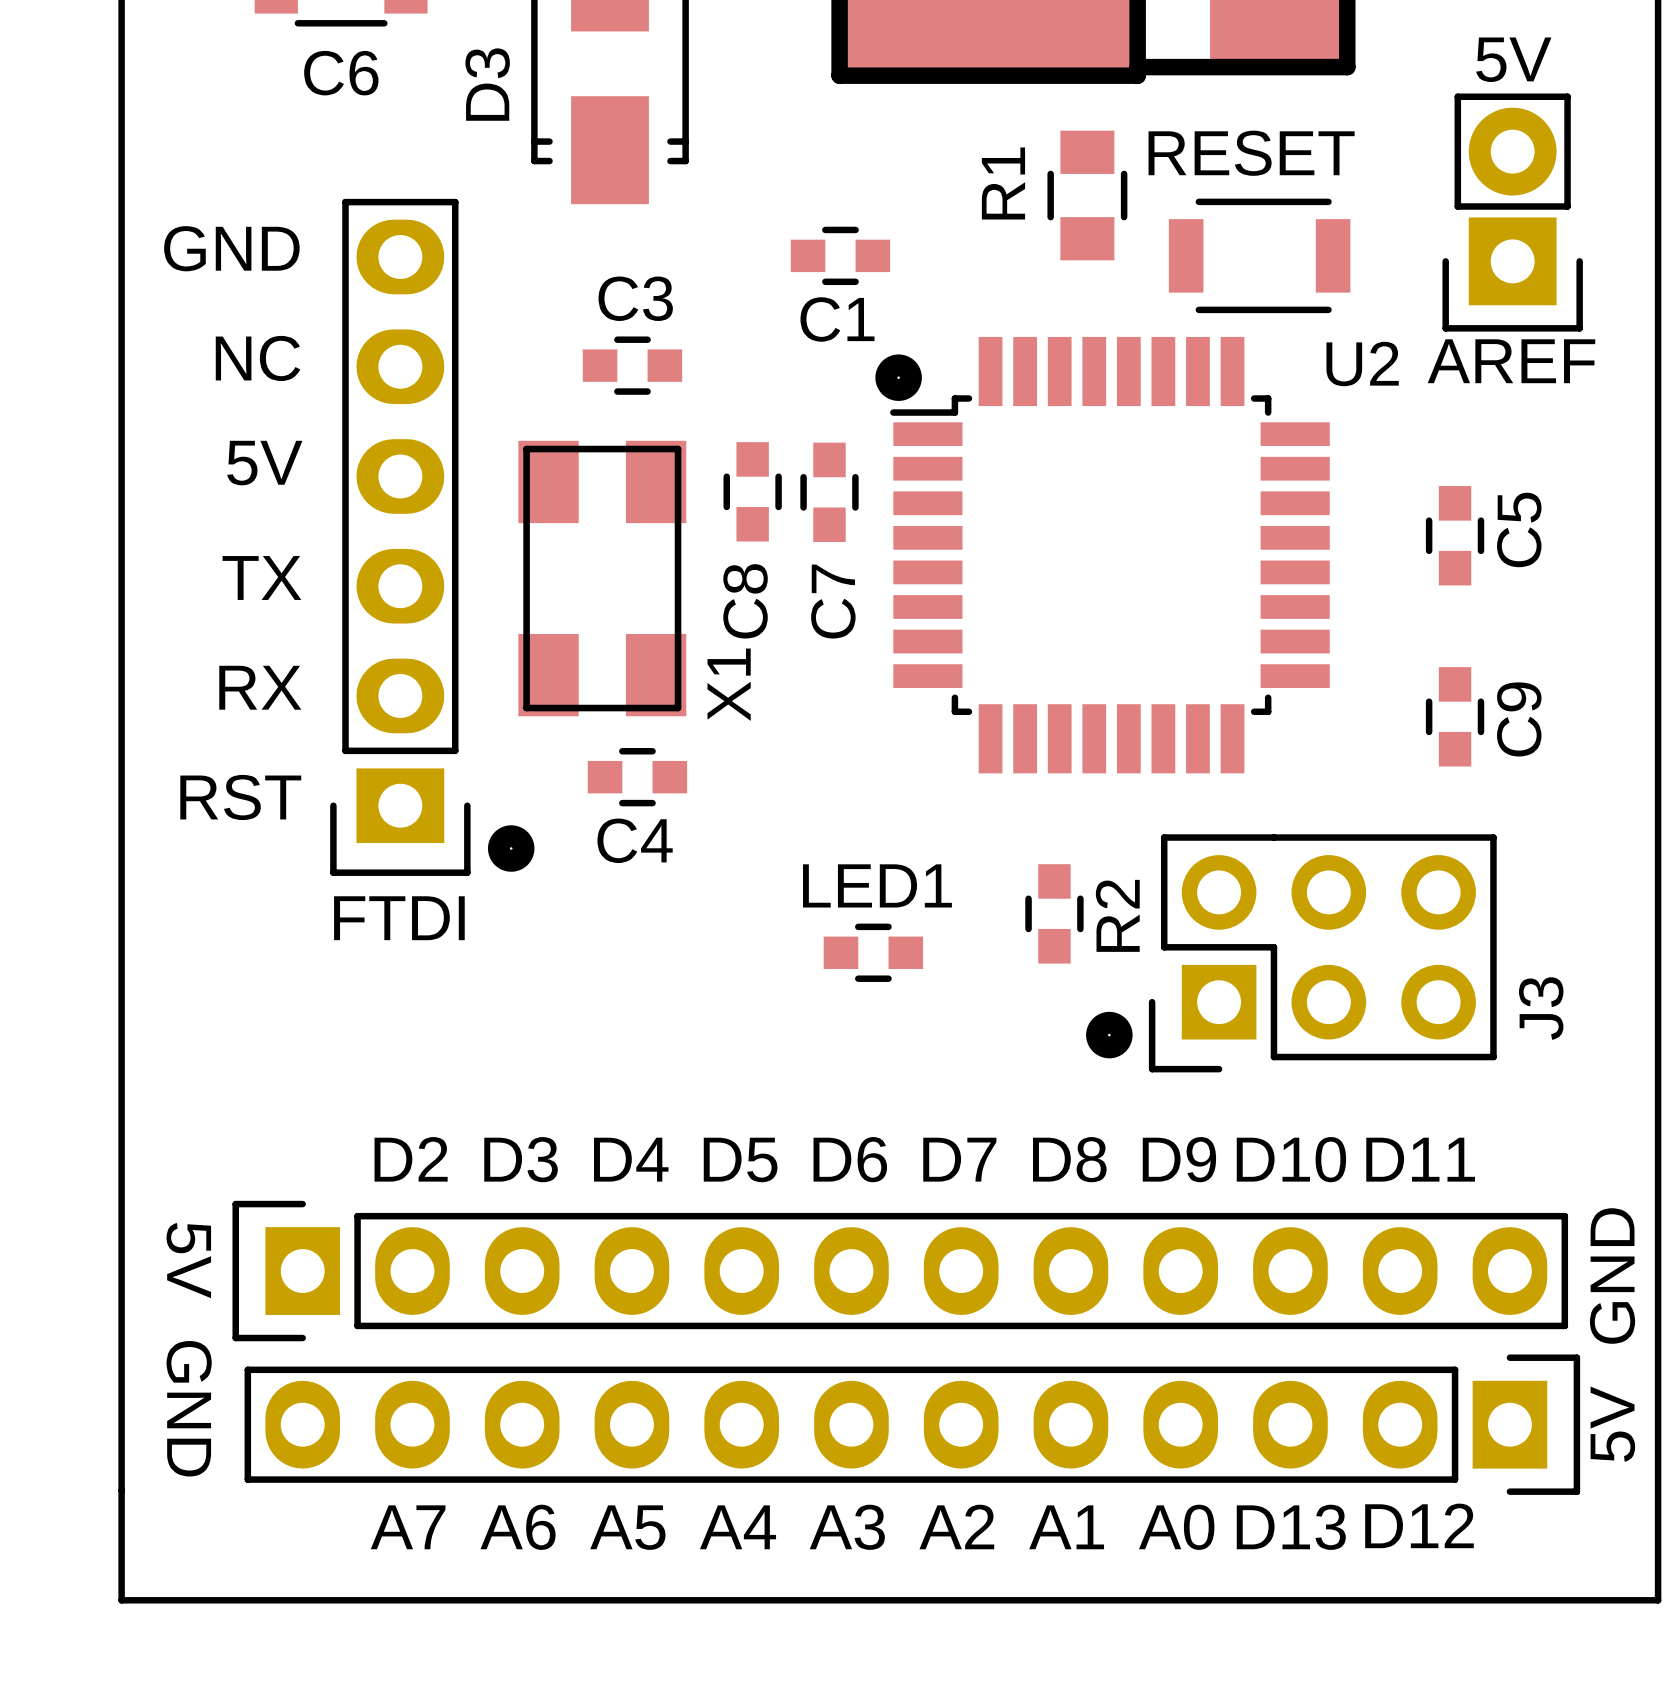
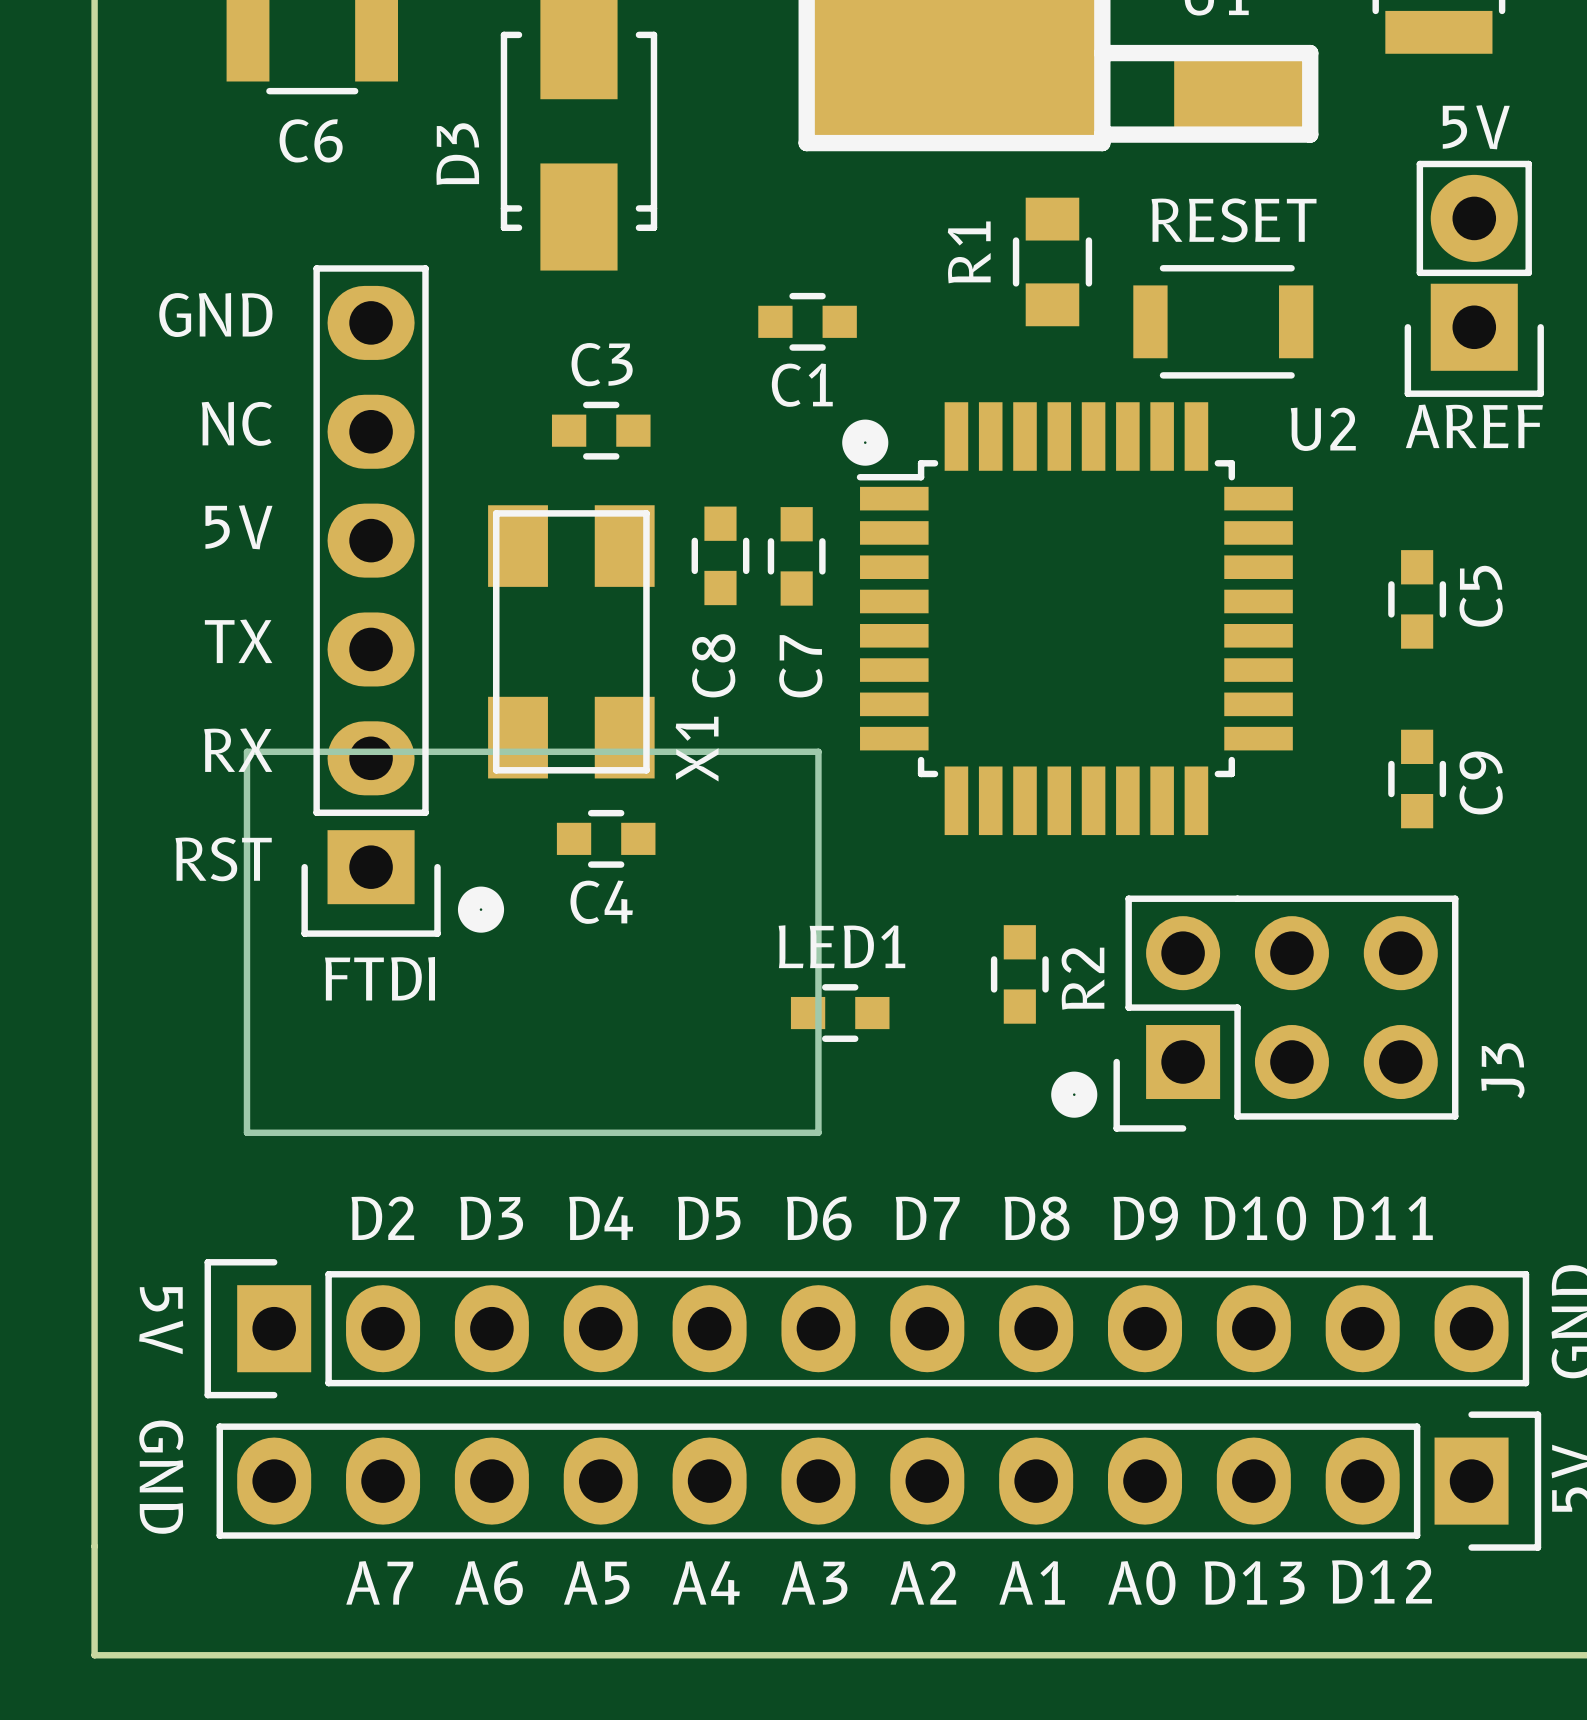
line: none -> (246, 751) (246, 1132) (818, 1132) (818, 751) (246, 751)

